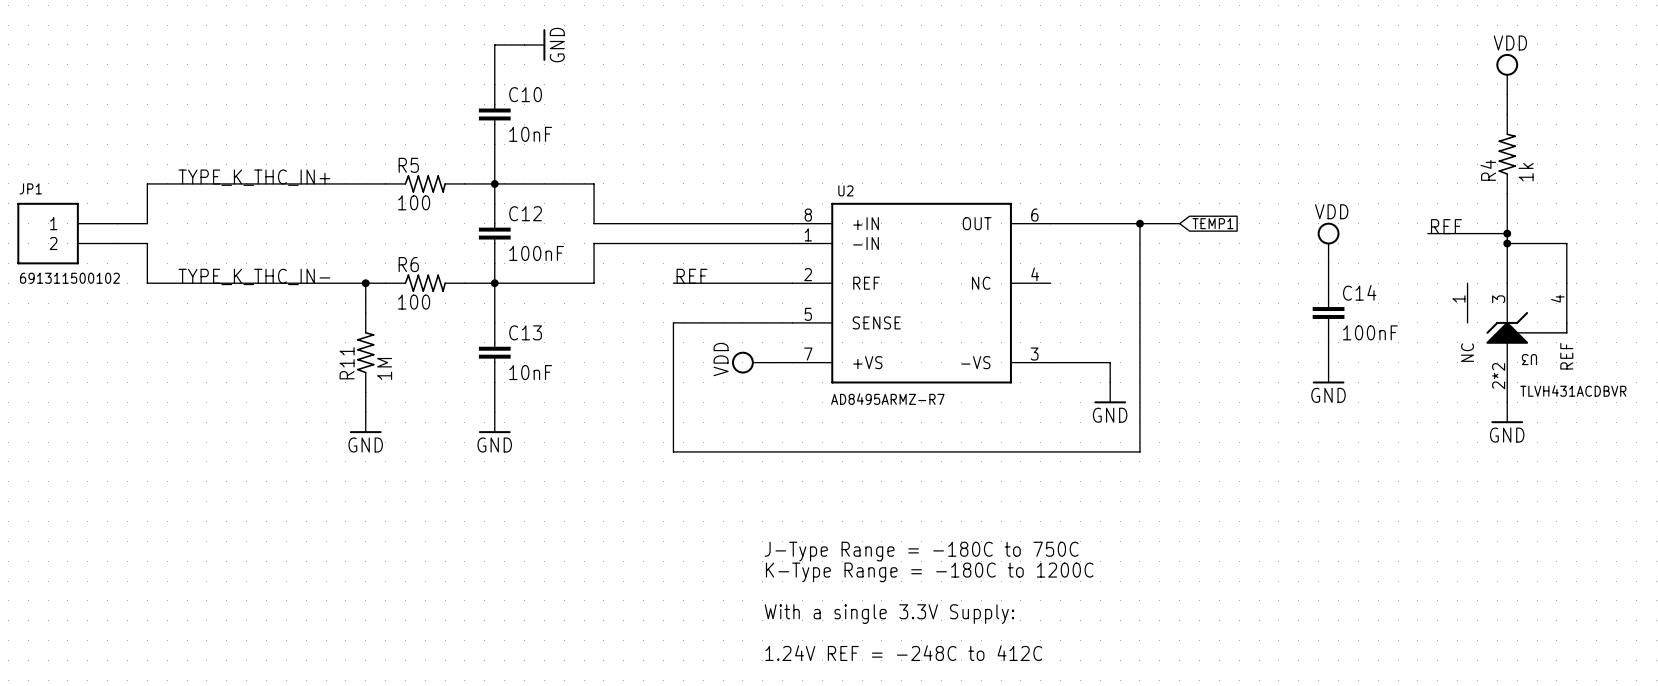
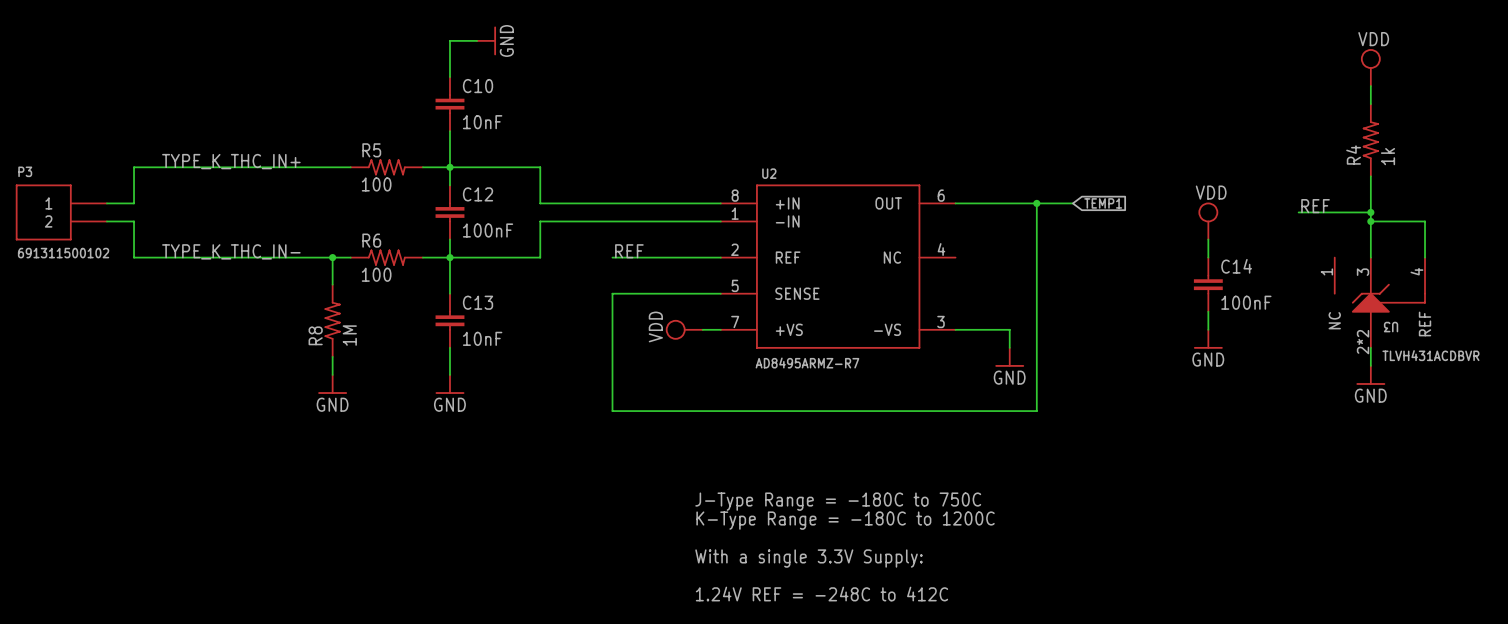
JP1 name: JP1 (30, 188) -> P3 (25, 171)
R11 name: R11 (347, 363) -> R8 (315, 335)

